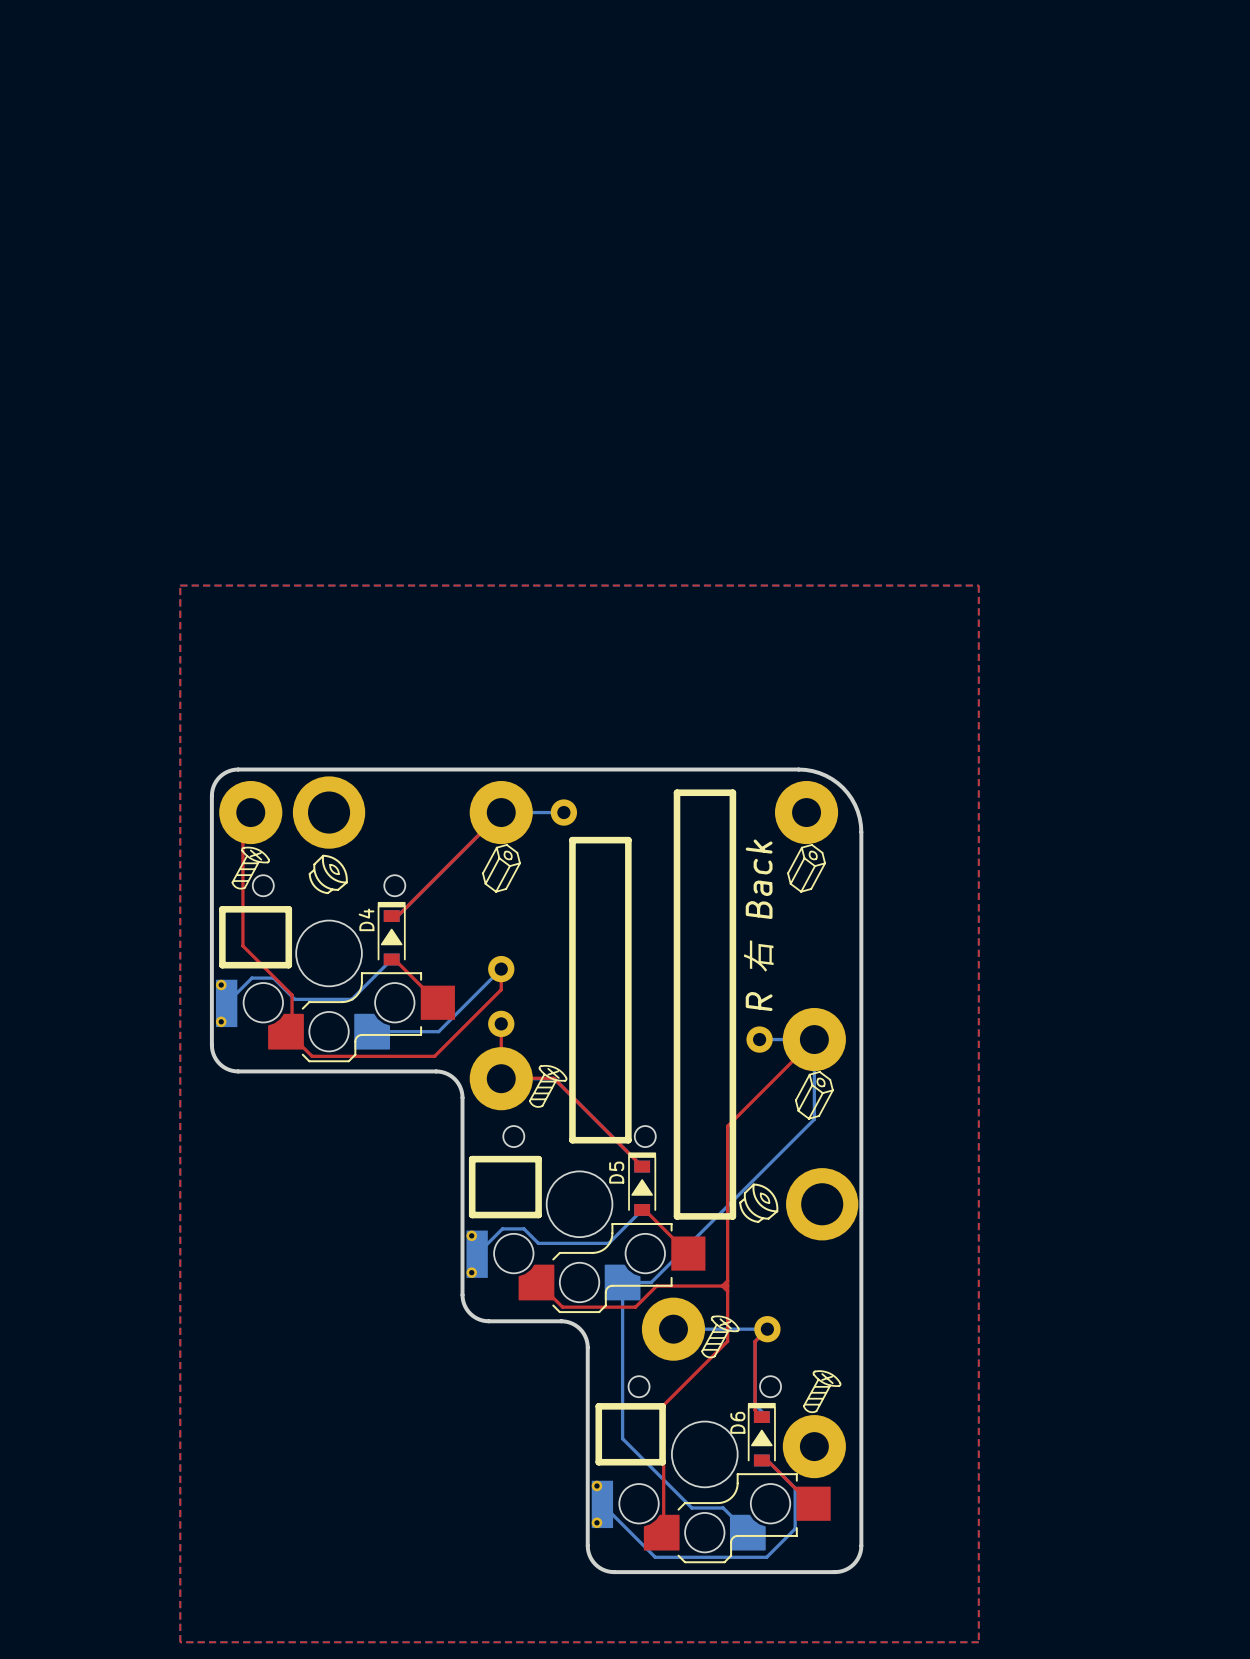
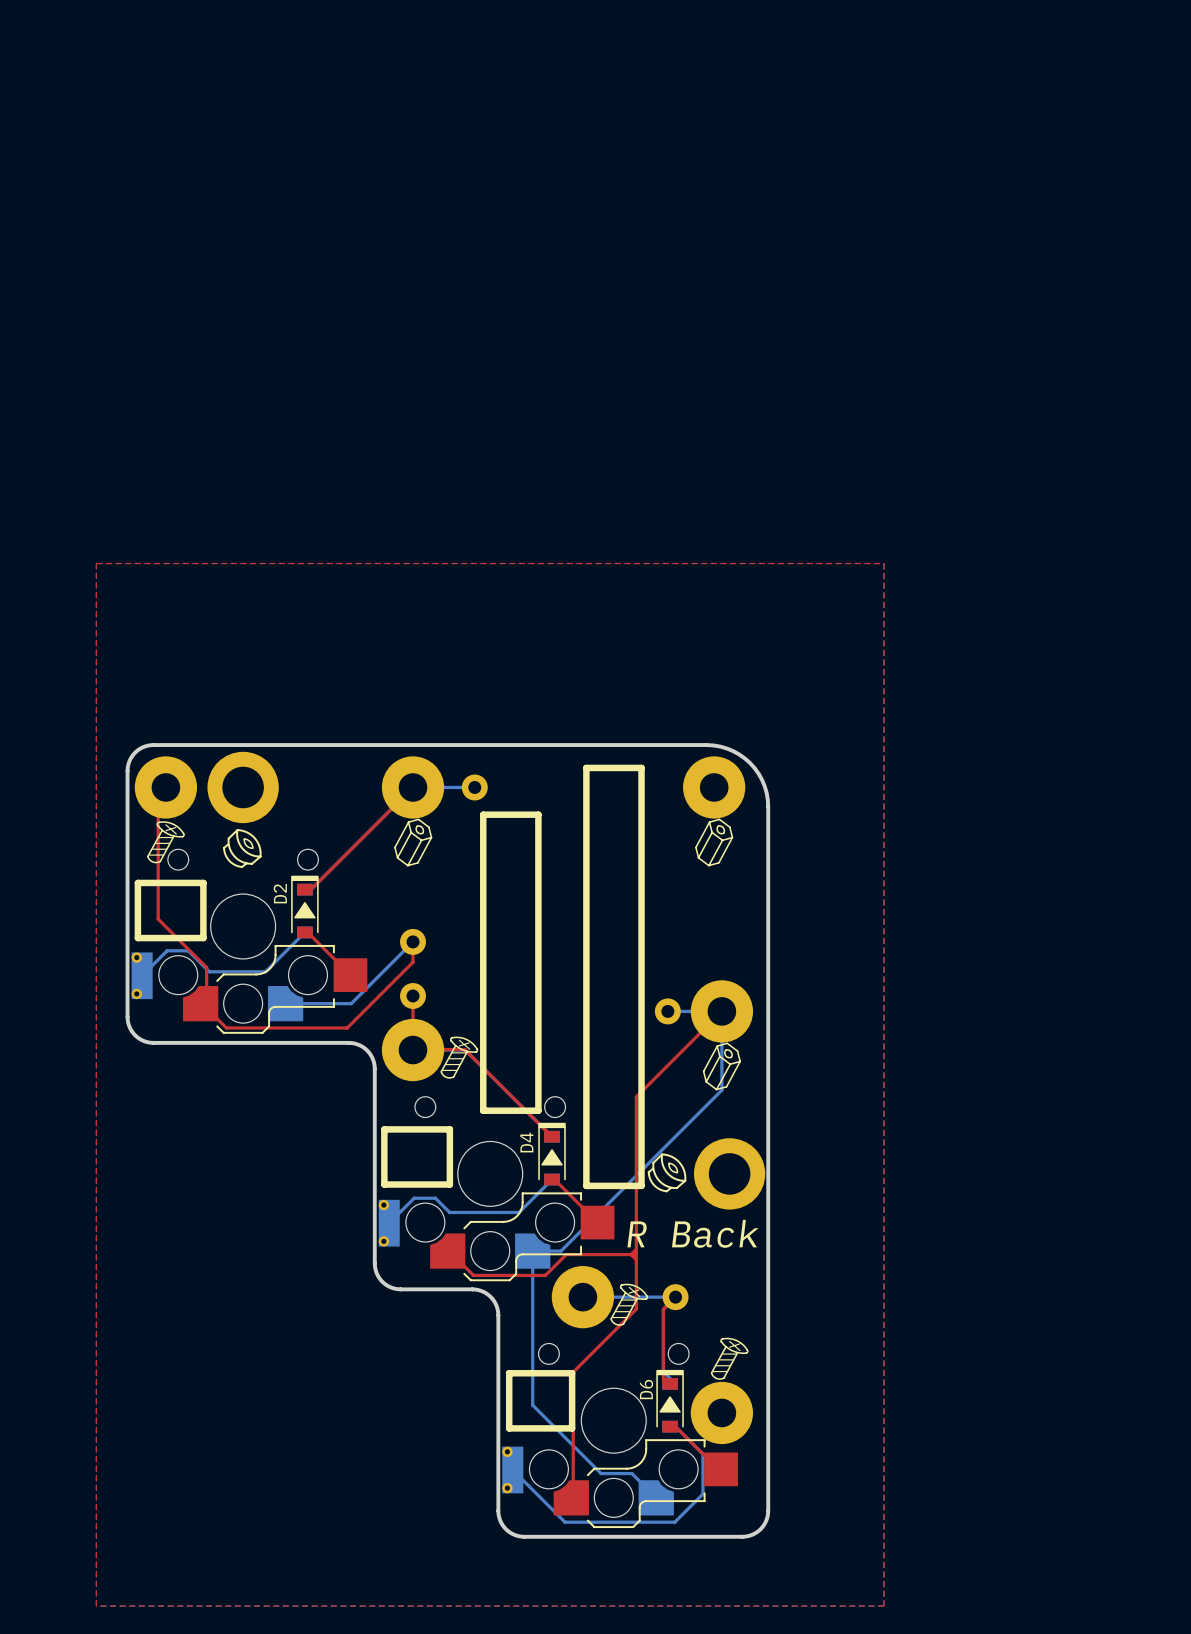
D4 name: D4 (366, 919) -> D2 (280, 893)
text: R 右 Back (758, 925) -> none
D5 name: D5 (616, 1172) -> D4 (526, 1142)
text: none -> R Back (692, 1233)

